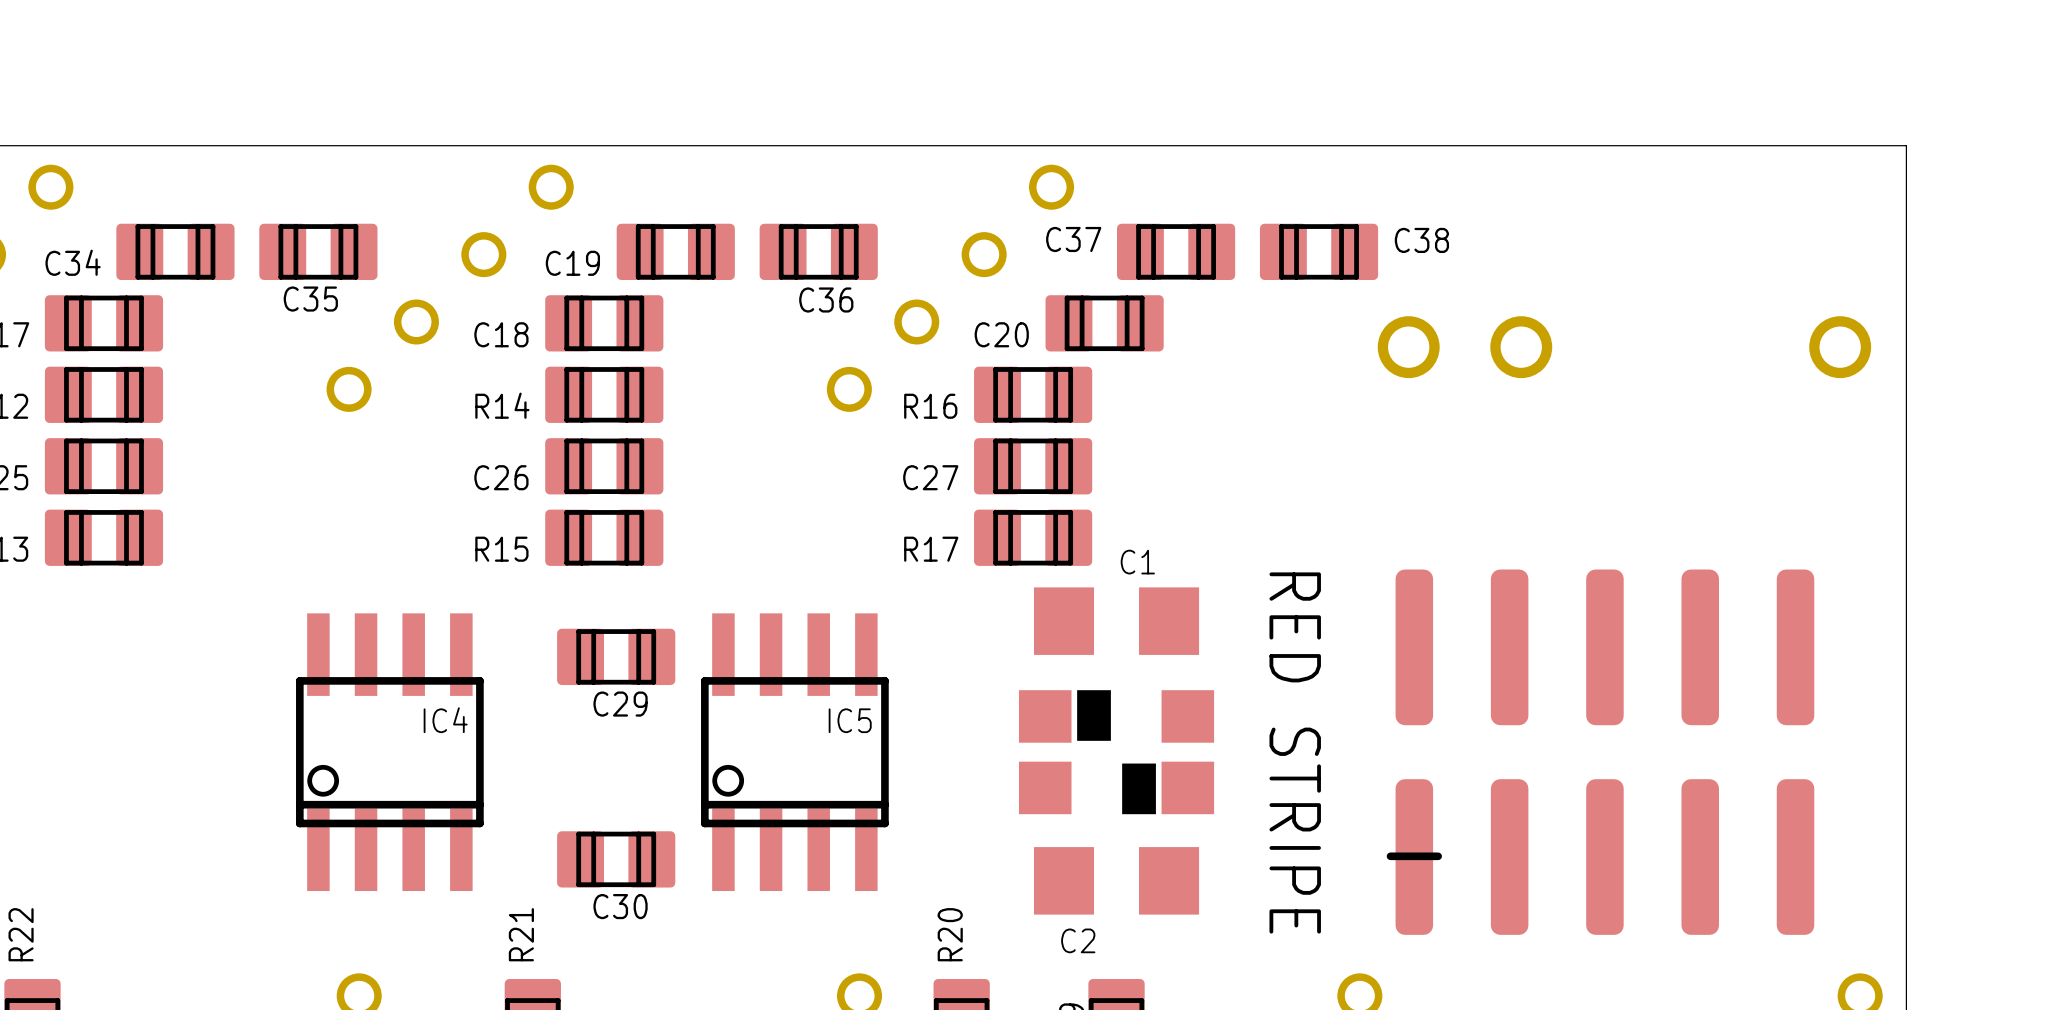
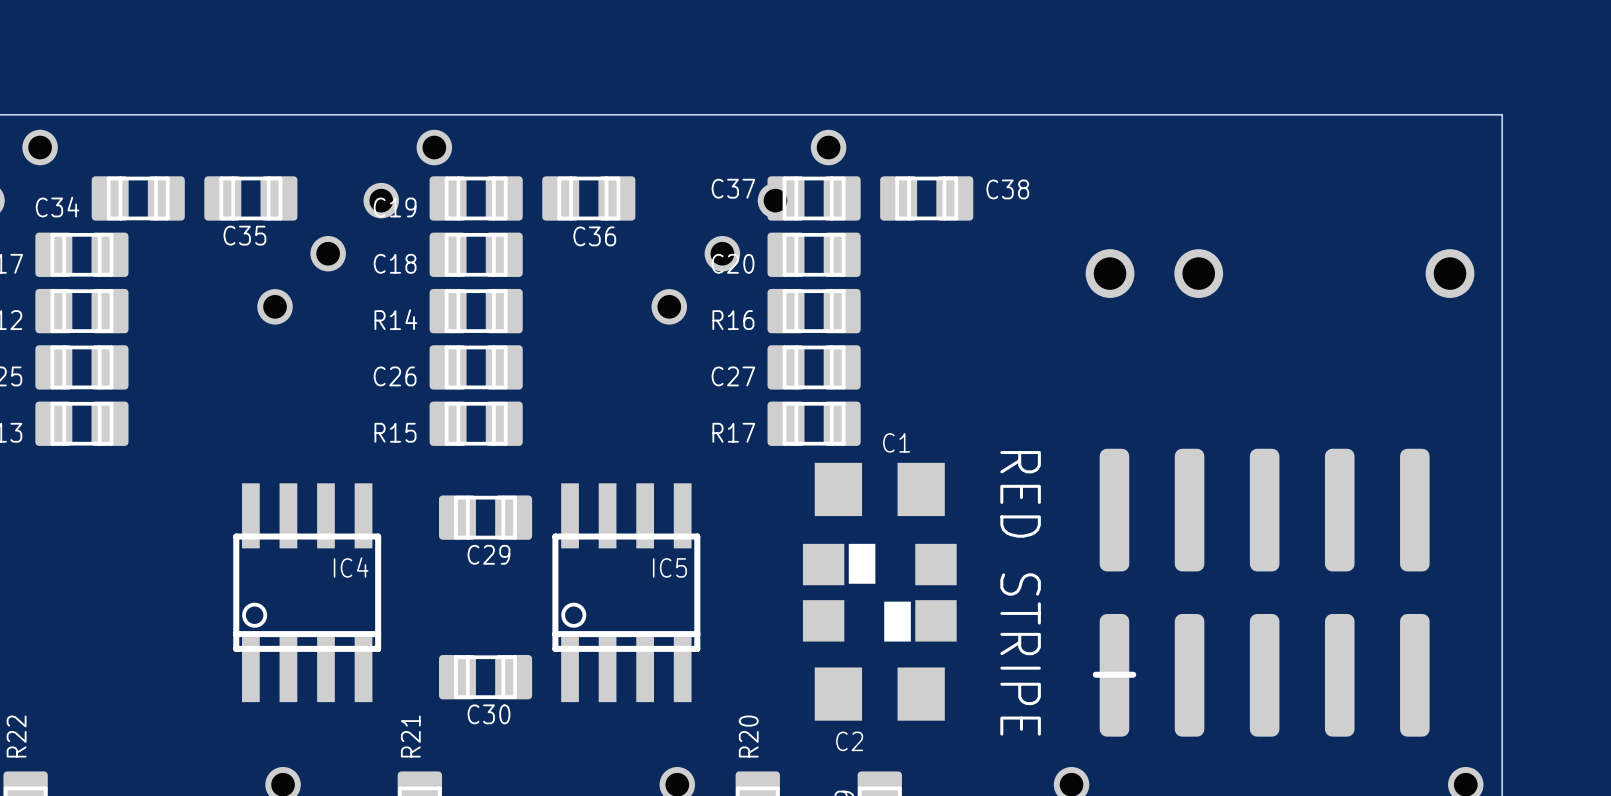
C37 name: C37 (1073, 239) -> C38 (1007, 189)
C19 position: (675, 251) -> (476, 198)
C36 position: (818, 251) -> (588, 198)
C37: none -> (814, 198)
C38: (1319, 251) -> none
C20 position: (1104, 323) -> (814, 254)

